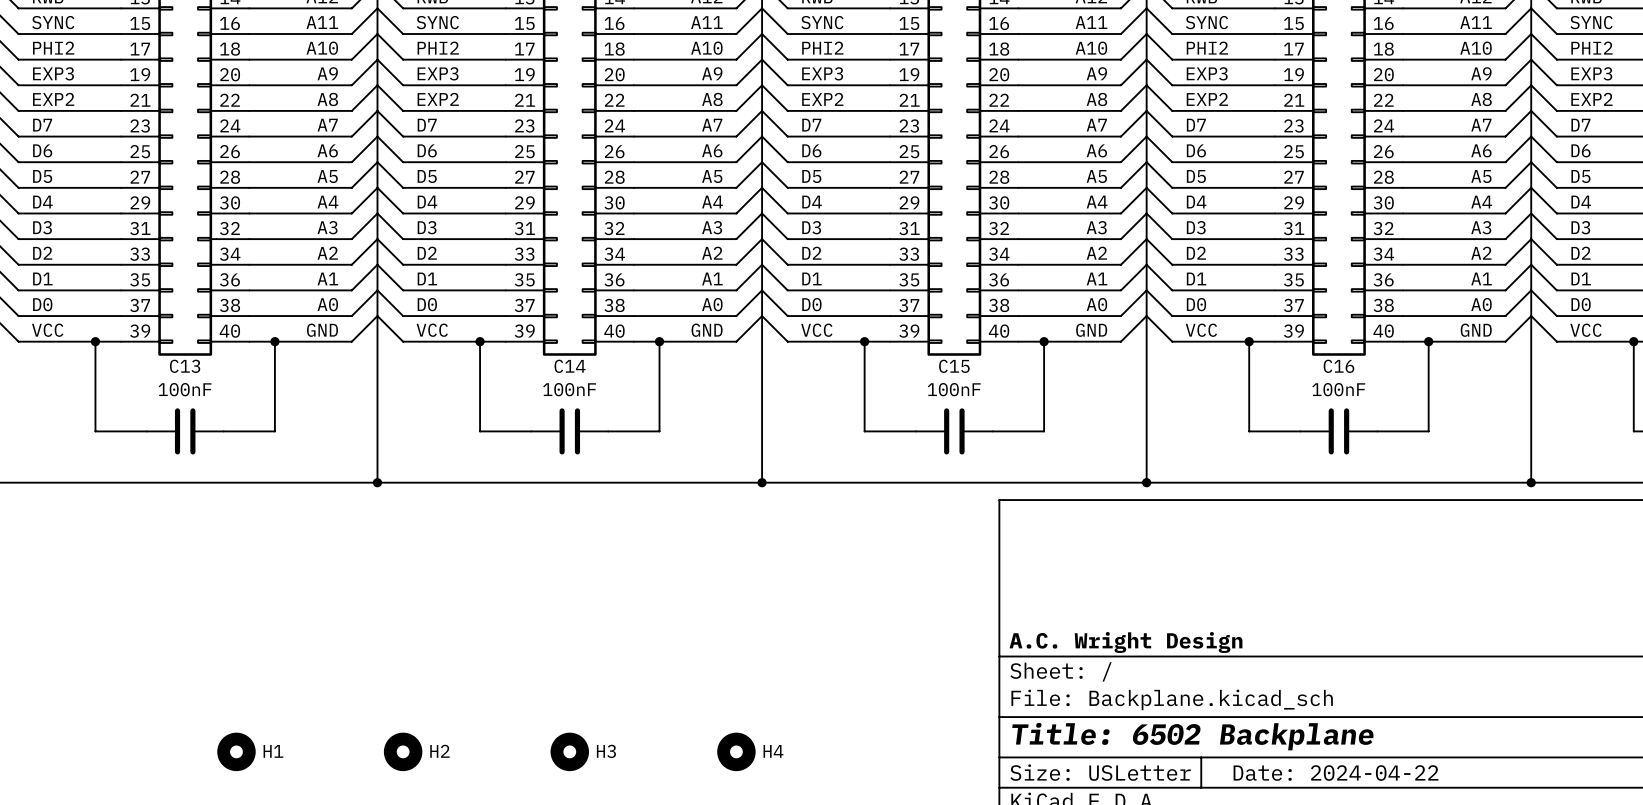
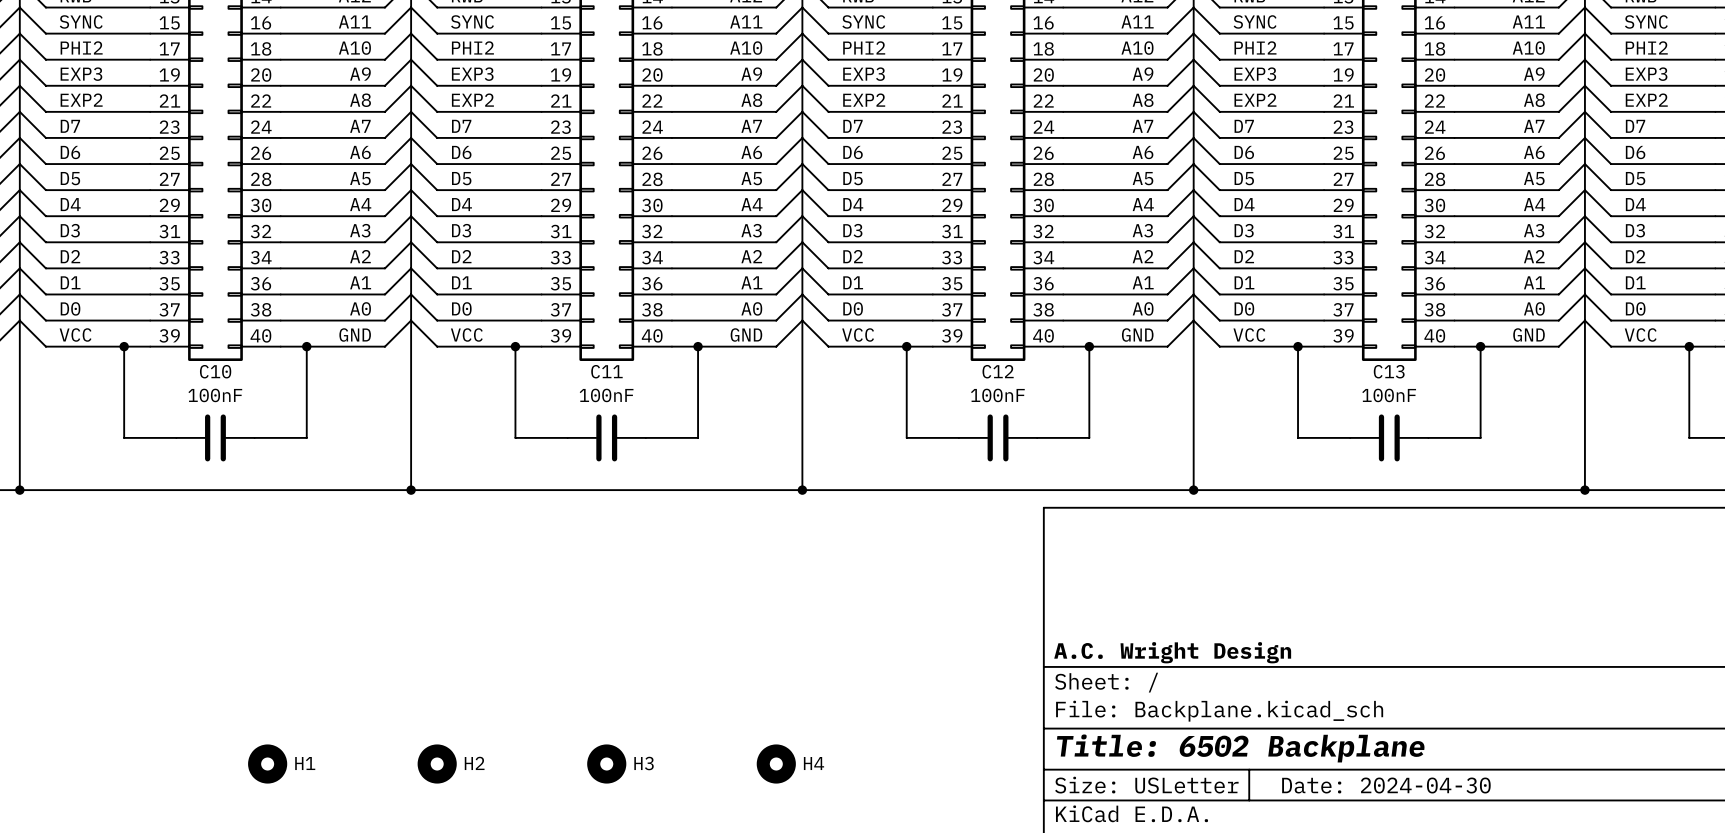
C13 name: C13 (185, 366) -> C10 (215, 371)
C14 name: C14 (570, 366) -> C11 (606, 371)
C15 name: C15 (954, 366) -> C12 (998, 371)
C16 name: C16 (1338, 366) -> C13 (1389, 371)
title block: Date: 2024-04-22 (1336, 773) -> Date: 2024-04-30 (1386, 785)

